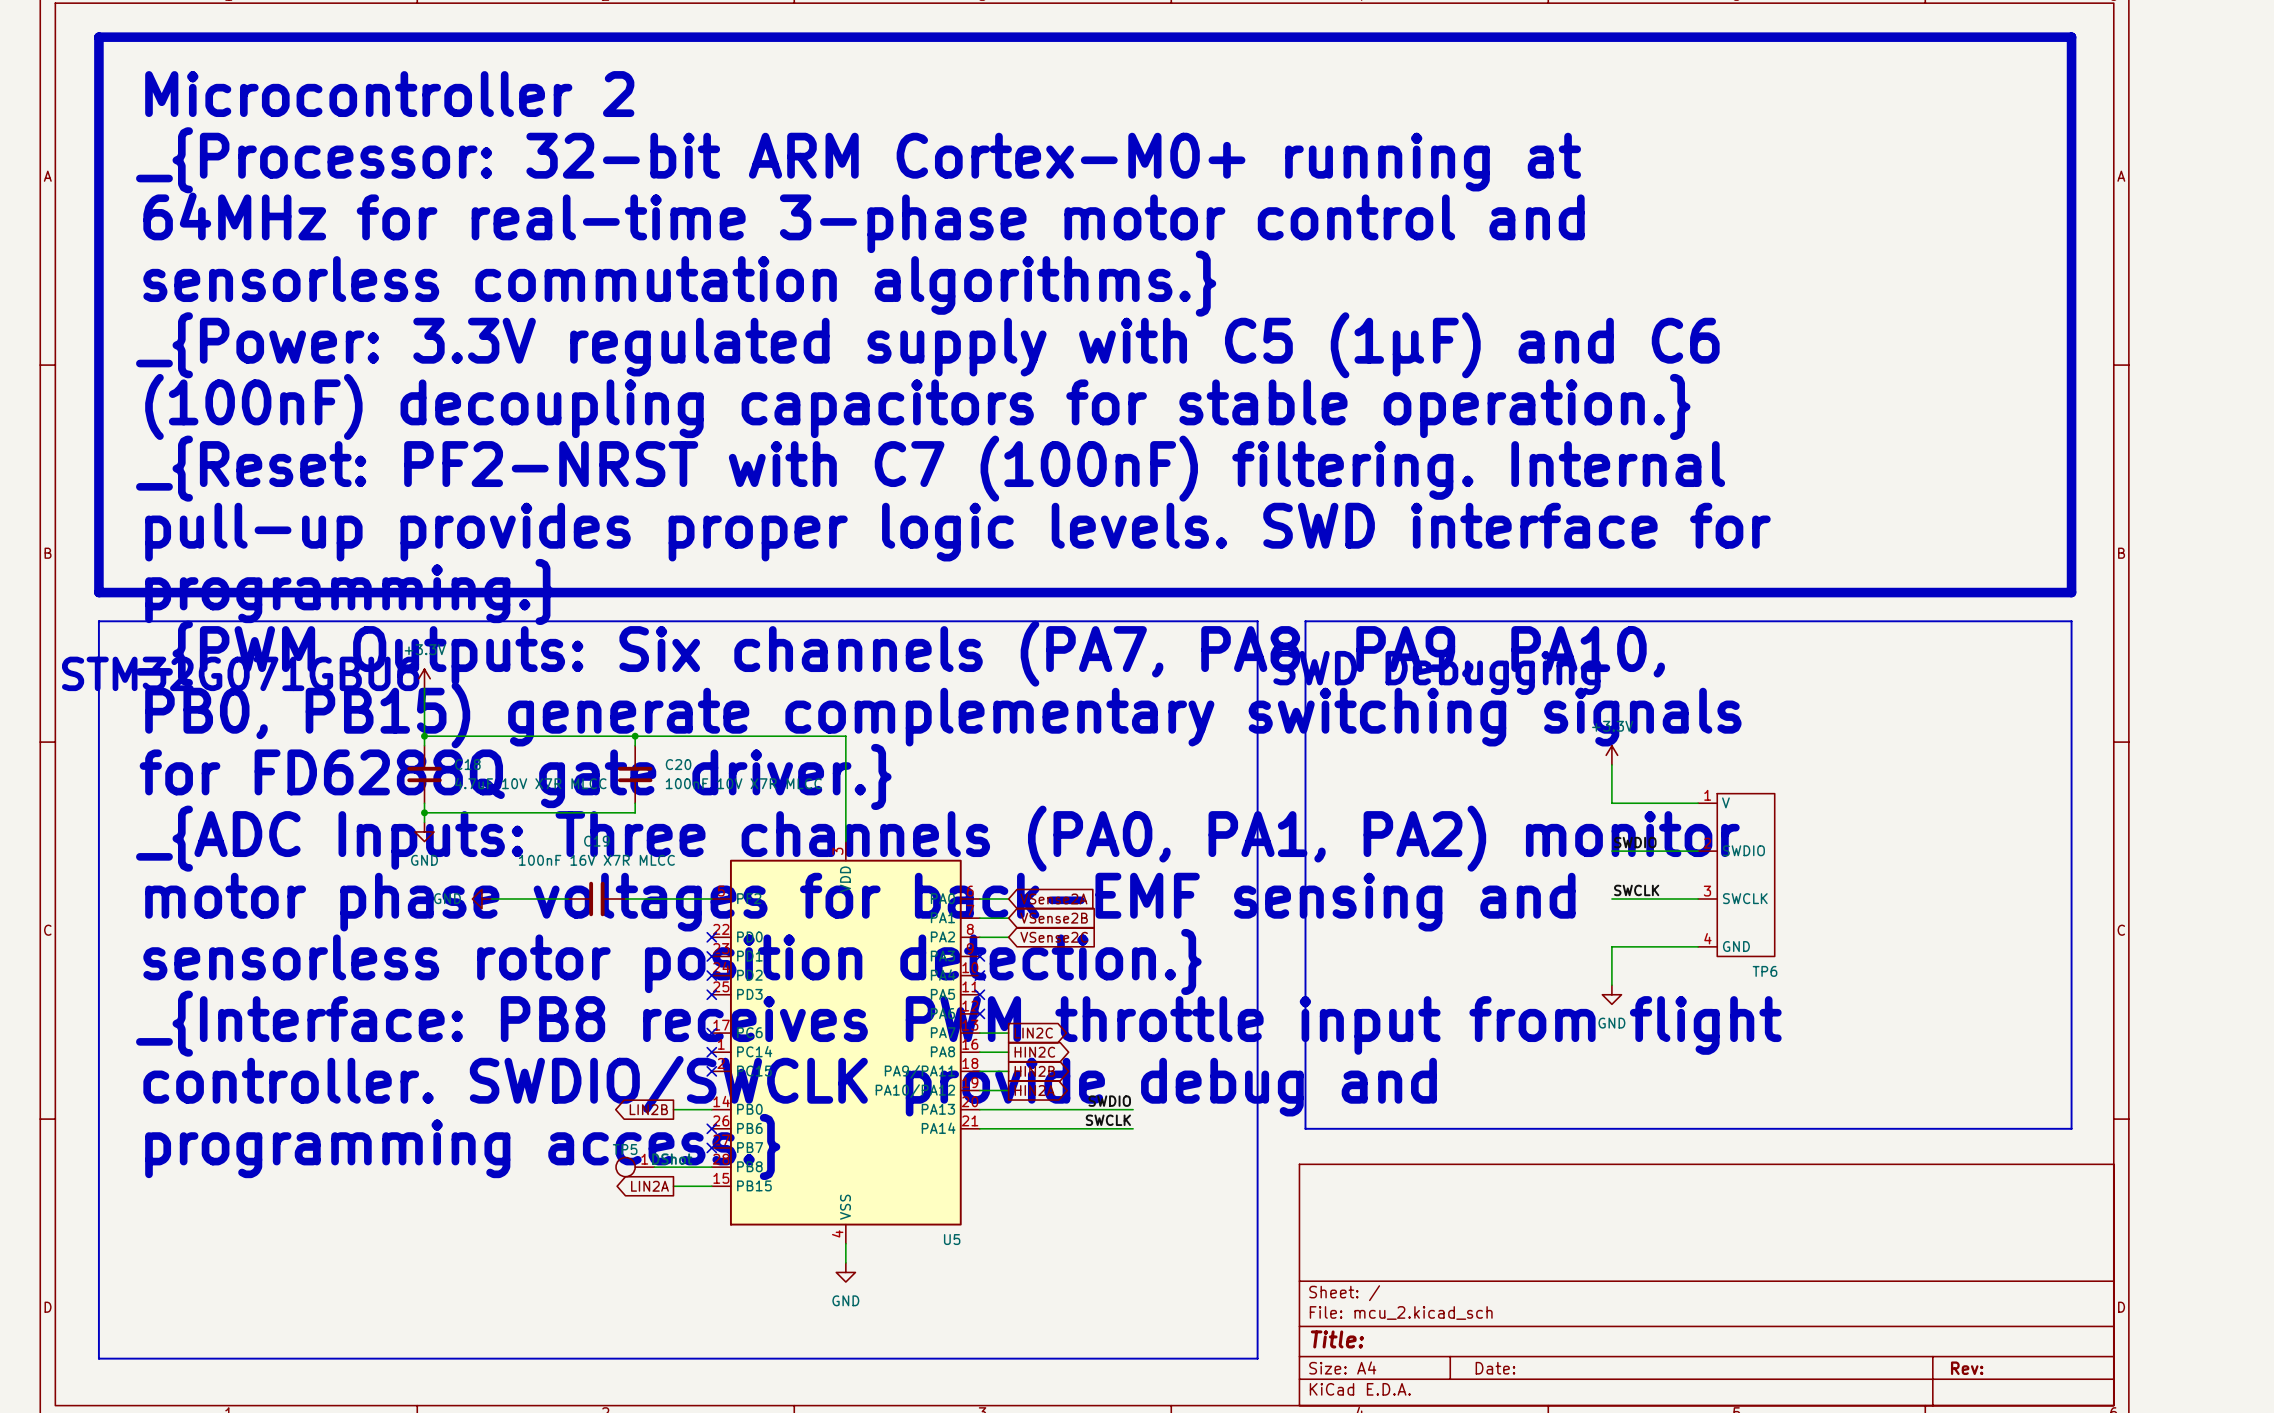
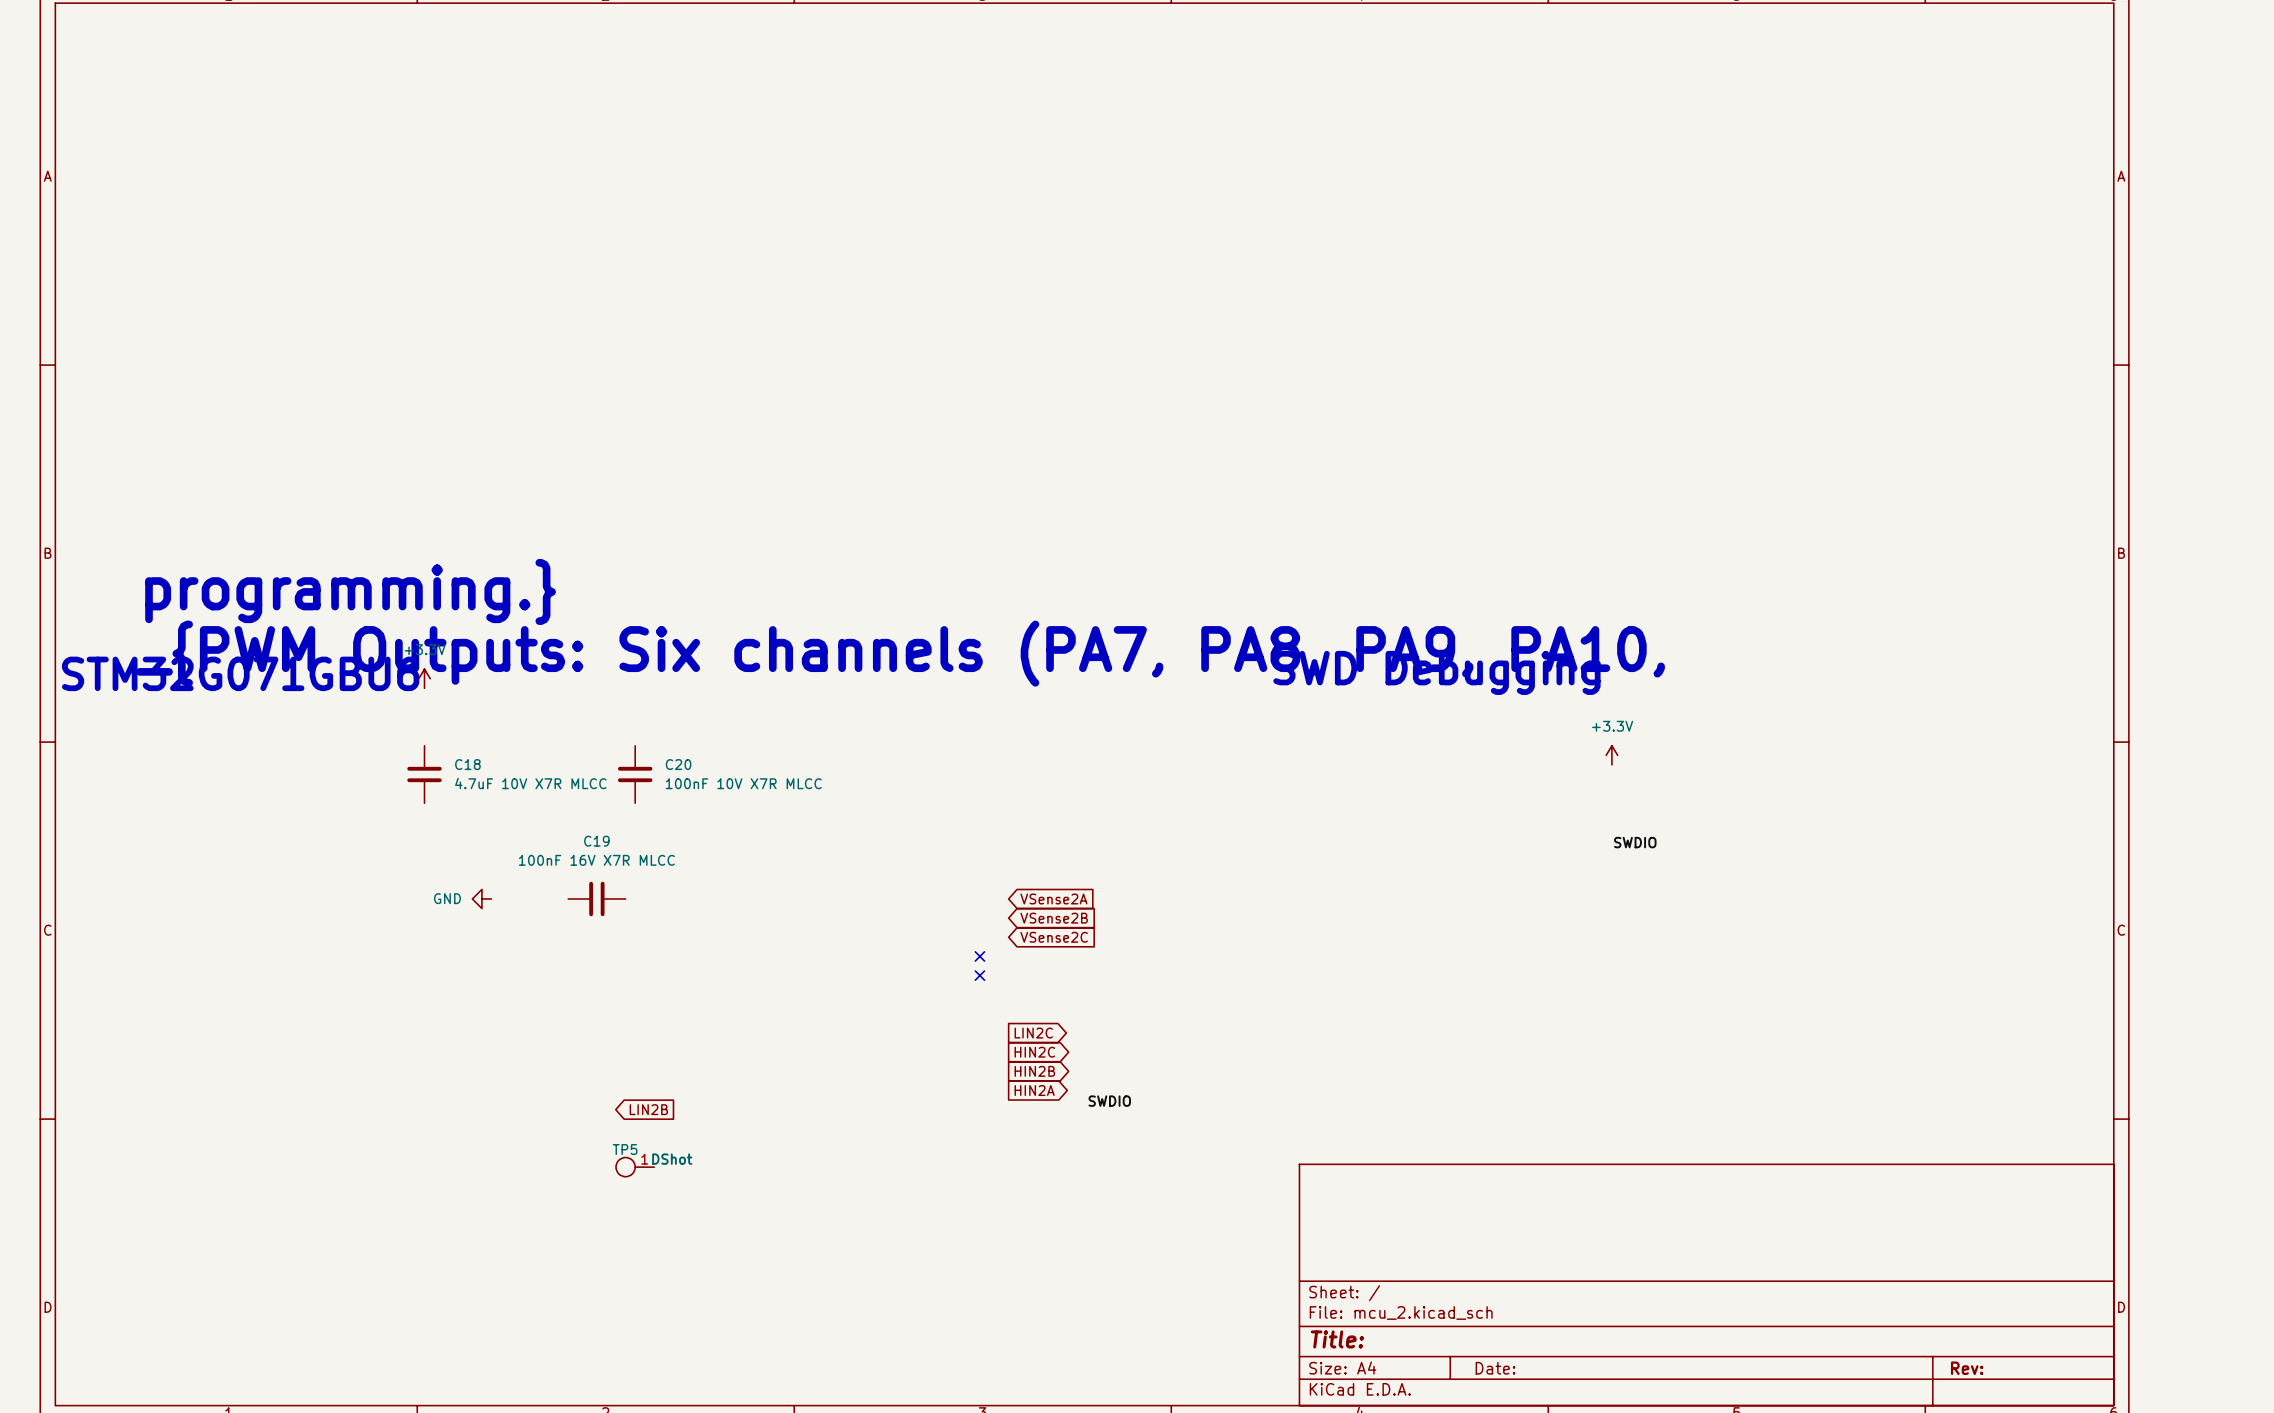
line: (98, 37) (2071, 37) (2071, 592) (98, 592) (98, 37) -> none
text: Microcontroller 2 (389, 94) -> none
text: _{Processor: 32-bit ARM Cortex-M0+ running at (858, 160) -> none
text: 64MHz for real-time 3-phase motor control and (863, 222) -> none
text: sensorless commutation algorithms.} (679, 283) -> none
text: _{Power: 3.3V regulated supply with C5 (1µF) and C6 (927, 345) -> none
text: (100nF) decoupling capacitors for stable operation.} (917, 406) -> none
text: _{Reset: PF2-NRST with C7 (100nF) filtering. Internal (930, 468) -> none
text: pull-up provides proper logic levels. SWD interface for (957, 532) -> none
line: (98, 621) (1257, 621) (1257, 1358) (98, 1358) (98, 621) -> none
line: (1305, 621) (2071, 621) (2071, 1128) (1305, 1128) (1305, 621) -> none
wire: (424, 688) (424, 745) -> none
text: PB0, PB15) generate complementary switching signals (943, 715) -> none
wire: (424, 736) (845, 736) (845, 841) -> none
junction: (424, 736) -> none
wire: (635, 736) (635, 745) -> none
junction: (635, 736) -> none
wire: (1611, 764) (1611, 803) (1698, 803) -> none
text: for FD6288Q gate driver.} (515, 776) -> none
wire: (424, 803) (424, 822) -> none
wire: (635, 803) (635, 812) (424, 812) -> none
junction: (424, 812) -> none
power symbol: GND (424, 831) -> none
text: _{ADC Inputs: Three channels (PA0, PA1, PA2) monitor (937, 838) -> none
wire: (1611, 851) (1698, 851) -> none
TP6: (1736, 875) -> none
label: SWCLK (1636, 890) -> none
wire: (491, 898) (568, 898) -> none
wire: (625, 898) (711, 898) -> none
wire: (979, 898) (1008, 898) -> none
wire: (1611, 898) (1698, 898) -> none
text: motor phase voltages for back-EMF sensing and (860, 902) -> none
wire: (979, 918) (1008, 918) -> none
no-connect mark: (711, 937) -> none
wire: (979, 937) (1008, 937) -> none
wire: (1698, 946) (1611, 946) (1611, 985) -> none
no-connect mark: (711, 956) -> none
text: sensorless rotor position detection.} (672, 961) -> none
no-connect mark: (711, 975) -> none
no-connect mark: (711, 994) -> none
no-connect mark: (979, 994) -> none
power symbol: GND (1611, 994) -> none
no-connect mark: (979, 1013) -> none
text: _{Interface: PB8 receives PWM throttle input from flight (958, 1023) -> none
no-connect mark: (711, 1033) -> none
wire: (979, 1033) (1008, 1033) -> none
U5: (845, 1042) -> none
no-connect mark: (711, 1052) -> none
wire: (979, 1052) (1008, 1052) -> none
no-connect mark: (711, 1071) -> none
wire: (979, 1071) (1008, 1071) -> none
text: controller. SWDIO/SWCLK provide debug and (790, 1086) -> none
wire: (979, 1090) (1008, 1090) -> none
wire: (673, 1109) (711, 1109) -> none
wire: (979, 1109) (1133, 1109) -> none
label: SWCLK (1108, 1120) -> none
no-connect mark: (711, 1128) -> none
wire: (979, 1128) (1133, 1128) -> none
text: programming access.} (462, 1146) -> none
no-connect mark: (711, 1147) -> none
wire: (654, 1167) (711, 1167) -> none
global label: LIN2A (649, 1186) -> none
wire: (673, 1186) (711, 1186) -> none
wire: (845, 1243) (845, 1262) -> none
power symbol: GND (845, 1272) -> none

